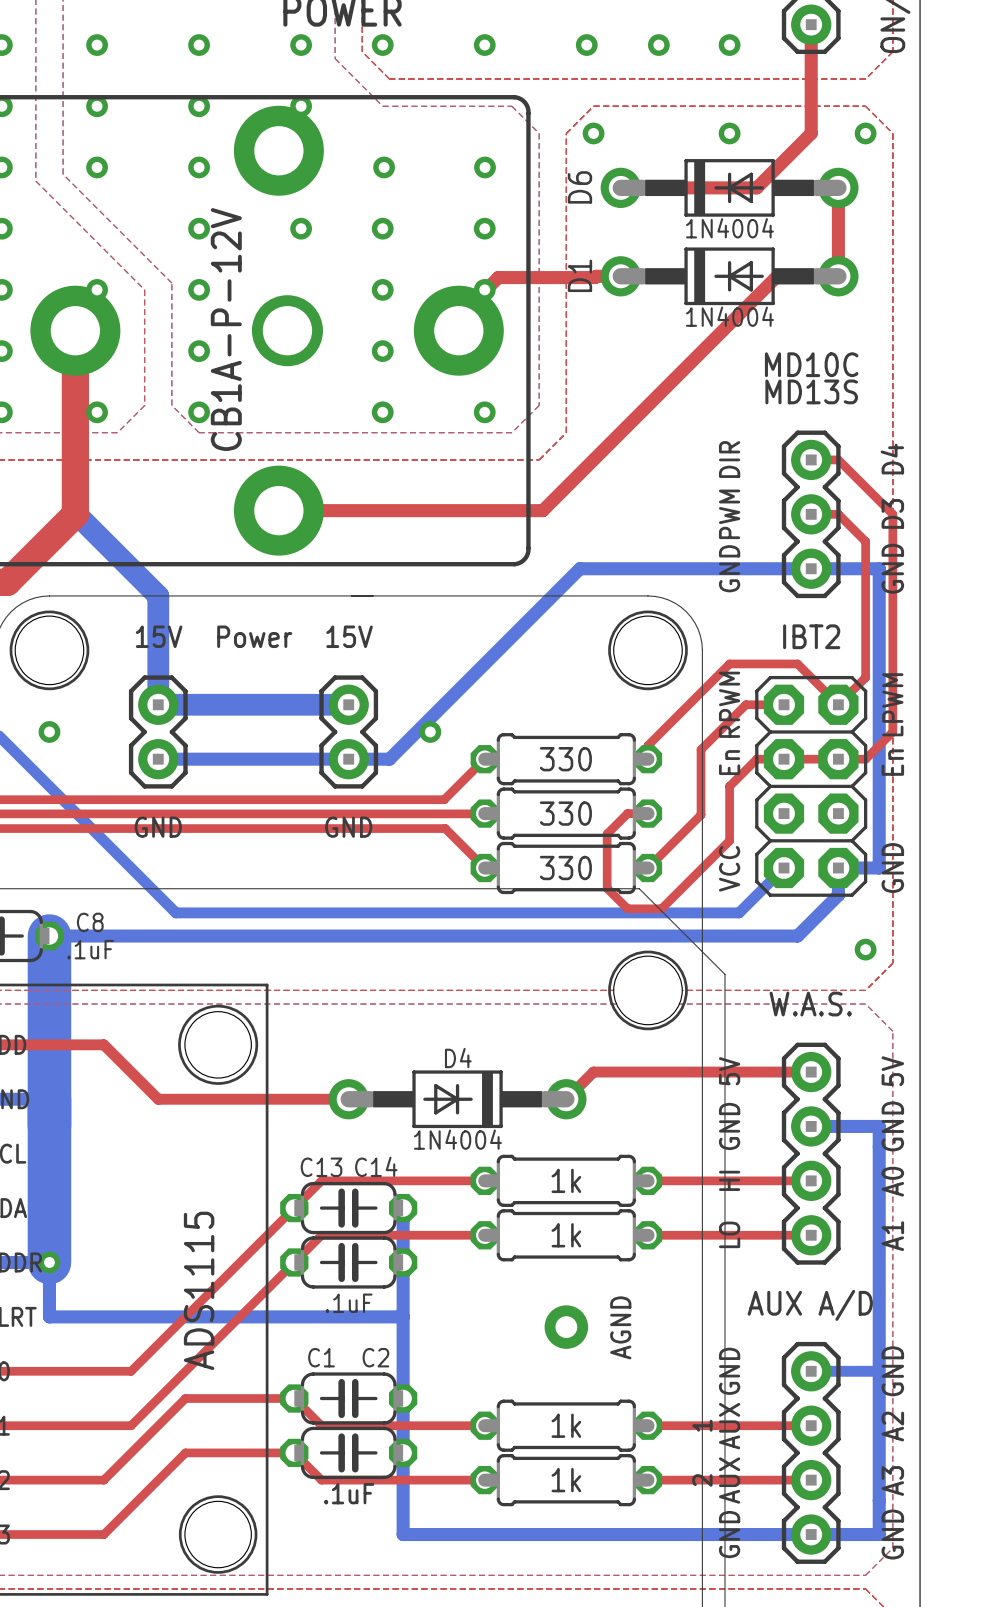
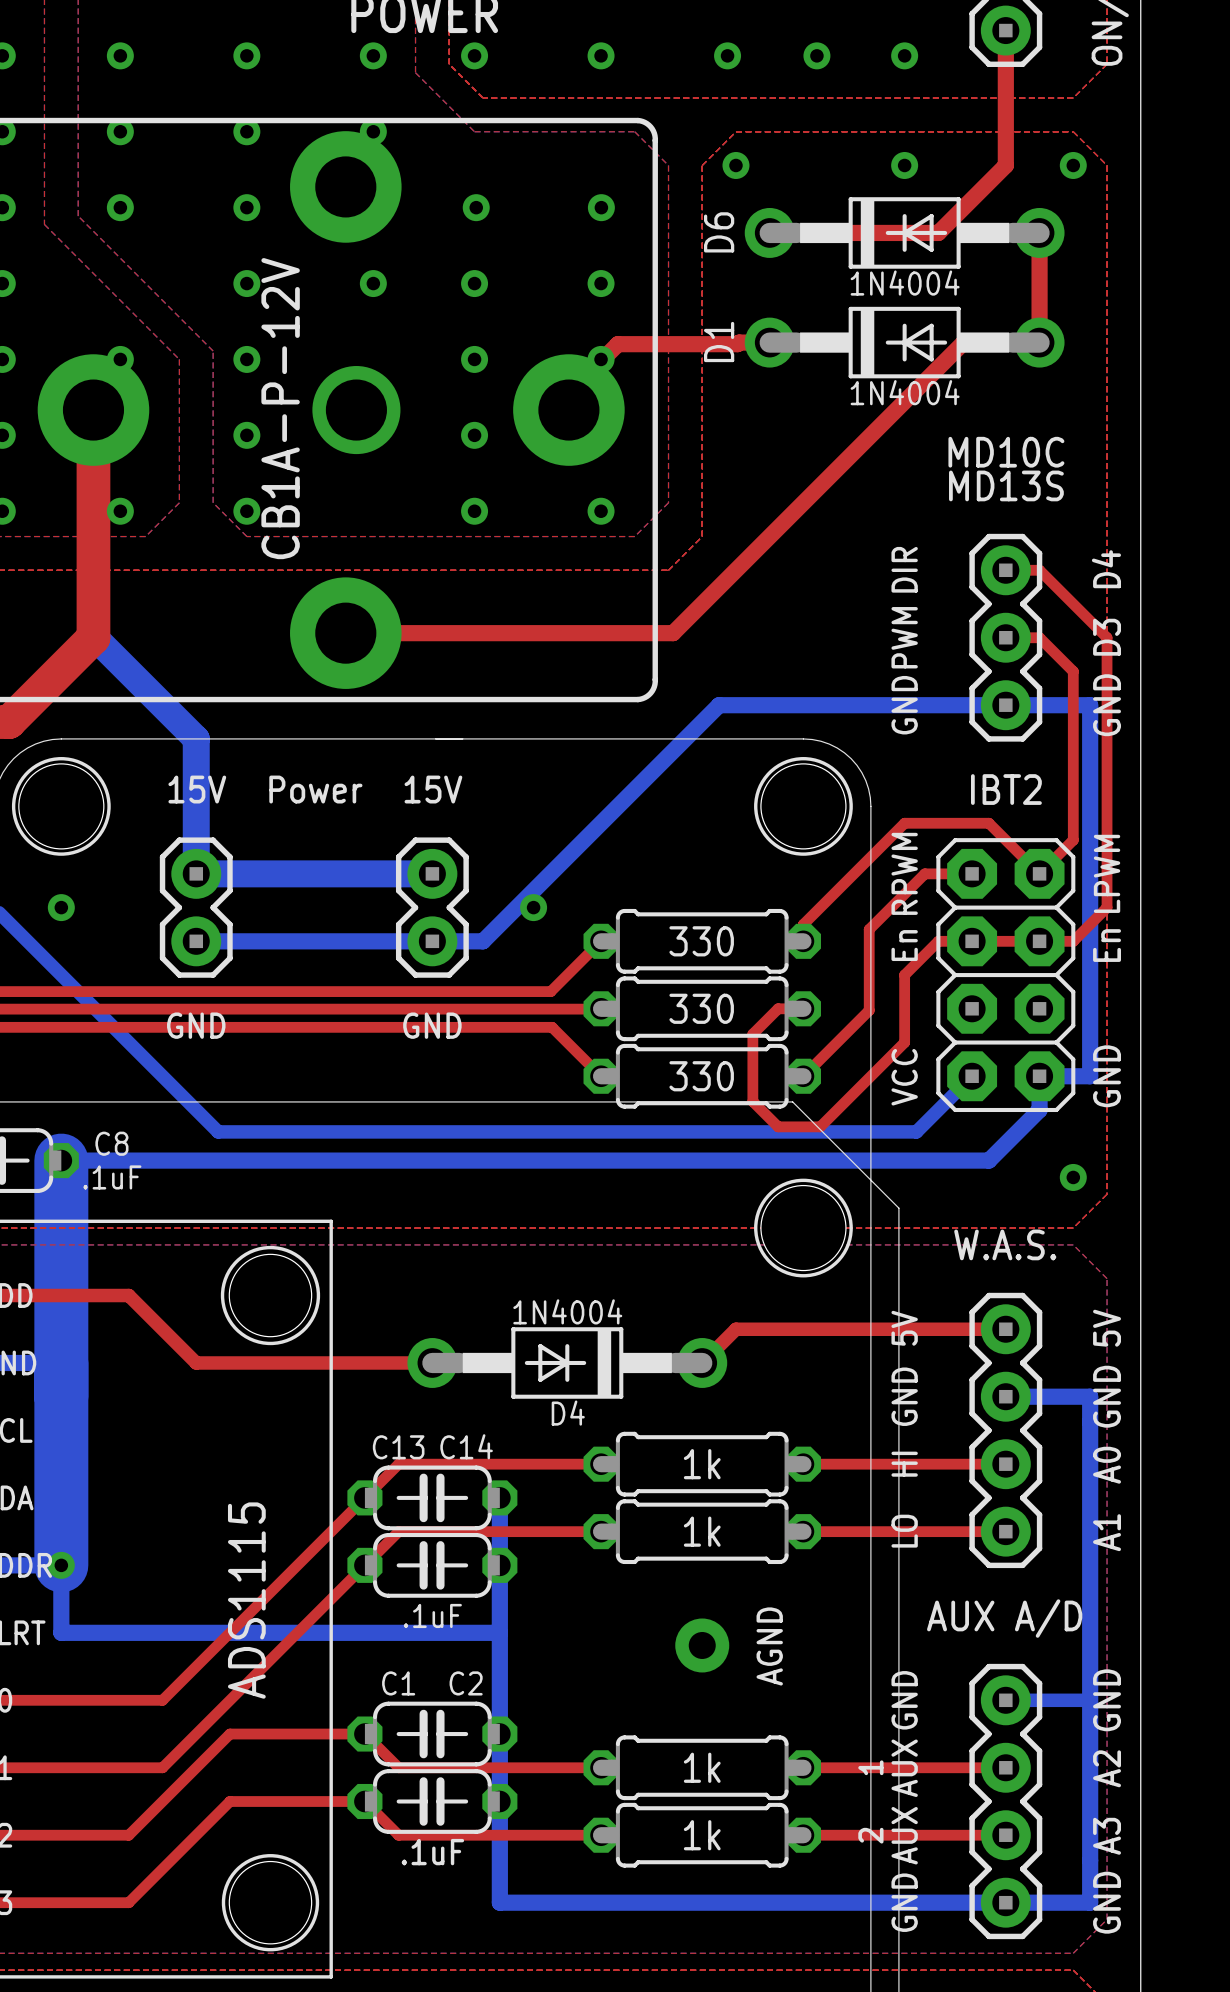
D4 name position: D4 (458, 1058) -> D4 (568, 1413)
D4 value position: 1N4004 (457, 1139) -> 1N4004 (567, 1311)

